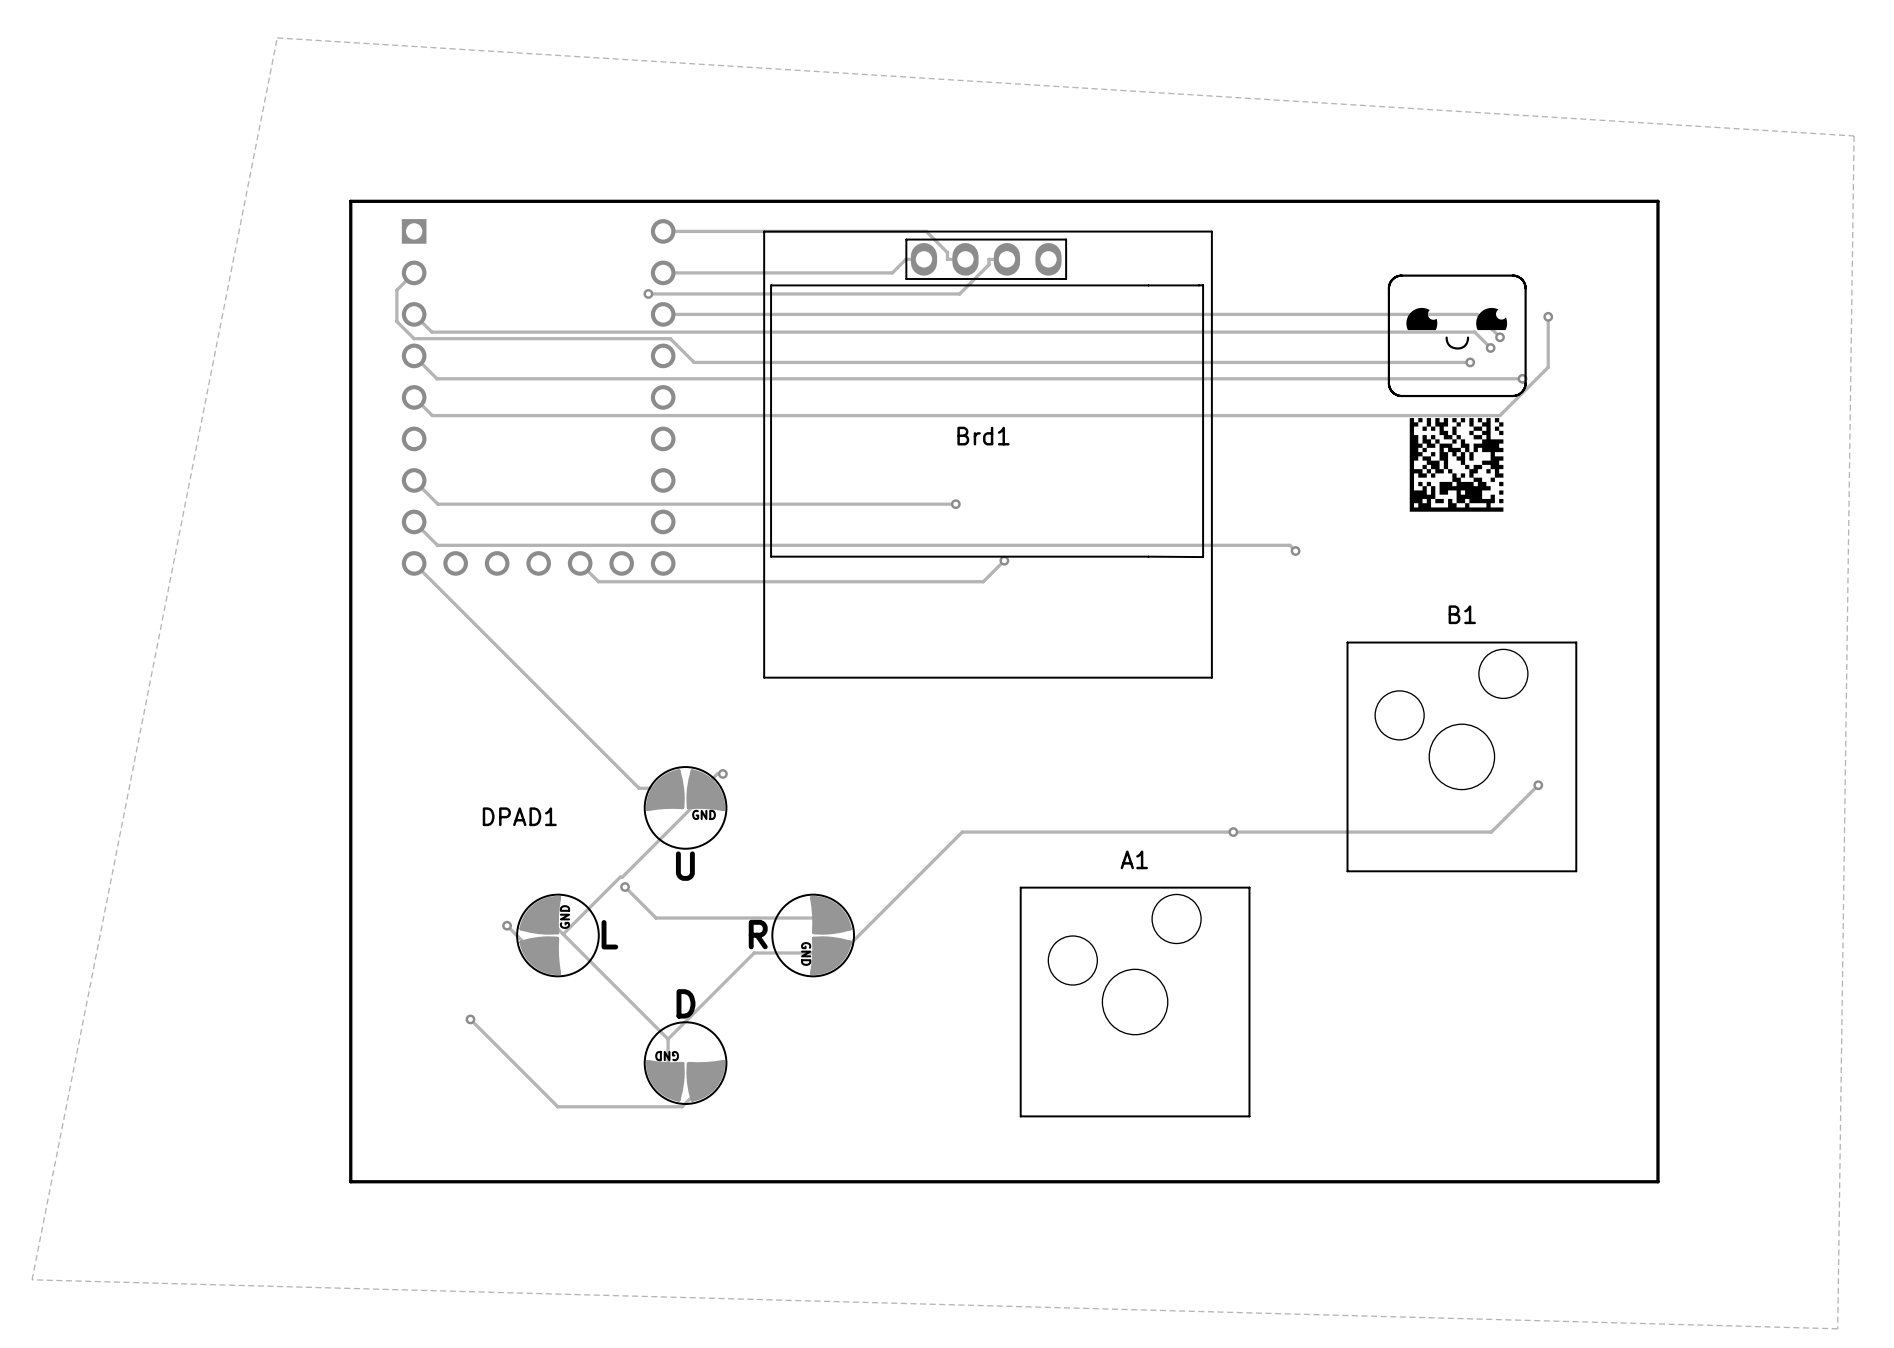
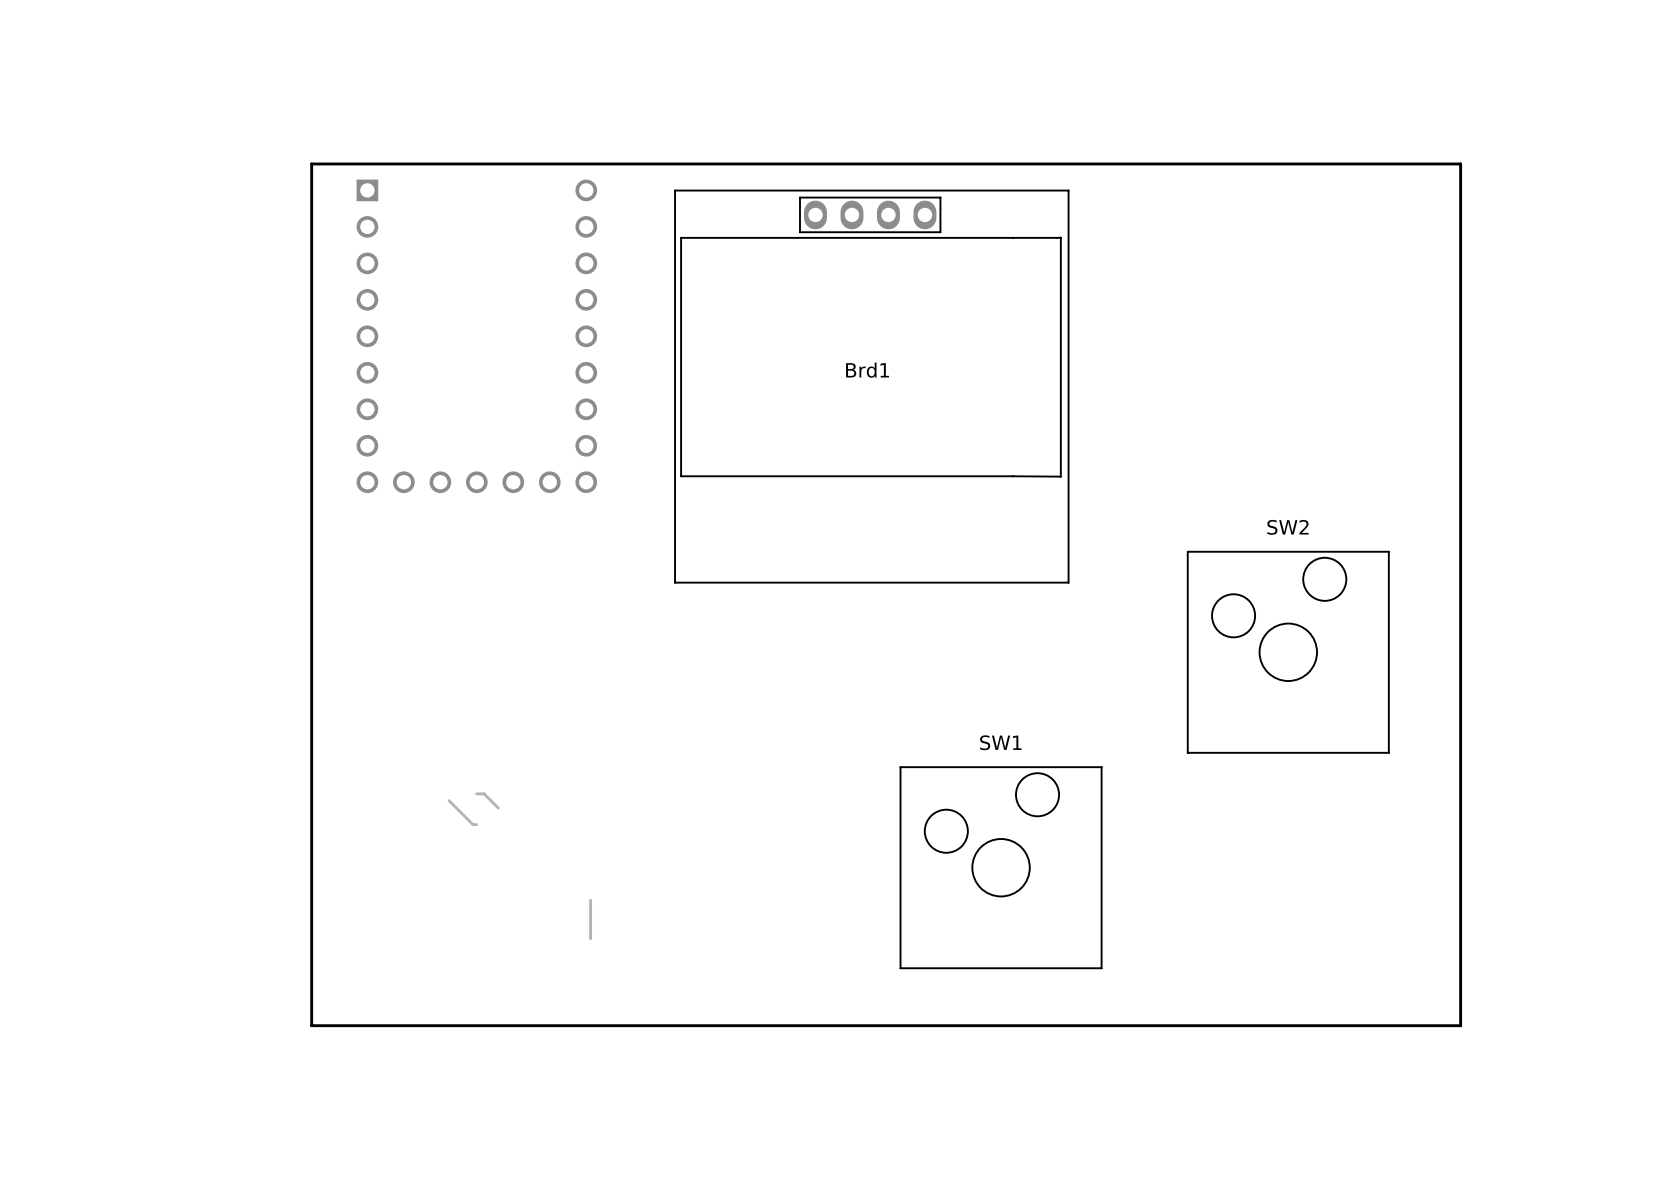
zone outline: (277, 37) (32, 1279) (1837, 1328) (1854, 135) (277, 37) -> none
track: (663, 231) (926, 231) (947, 252) (947, 259) (965, 259) -> none
track: (923, 259) (905, 259) (892, 272) (663, 272) -> none
track: (1006, 259) (988, 259) (988, 264) (959, 293) (648, 293) -> none
track: (414, 272) (396, 290) (396, 321) (414, 338) (670, 338) (694, 362) (1470, 362) -> none
line: (1399, 275) (1392, 279) (1388, 287) (1388, 383) (1393, 392) (1401, 396) (1512, 396) (1522, 391) (1525, 383) (1525, 288) (1521, 278) (1513, 275) (1399, 275) -> none
via: (648, 293) -> none
drawing: [1406, 307, 1508, 350] -> none
track: (414, 314) (431, 332) (1474, 332) (1490, 347) -> none
track: (663, 314) (1477, 314) (1500, 337) -> none
track: (1548, 316) (1548, 367) (1499, 415) (432, 415) (414, 397) -> none
via: (1548, 316) -> none
via: (1500, 337) -> none
via: (1490, 347) -> none
track: (414, 355) (437, 378) (1522, 378) -> none
via: (1470, 362) -> none
via: (1522, 378) -> none
drawing: [1409, 418, 1504, 512] -> none
track: (414, 480) (437, 504) (955, 504) -> none
via: (955, 504) -> none
track: (414, 521) (437, 545) (1289, 545) (1295, 551) -> none
via: (1295, 551) -> none
track: (1004, 560) (983, 581) (598, 581) (580, 563) -> none
via: (1004, 560) -> none
track: (414, 563) (638, 788) (668, 788) -> none
B1 name: B1 (1462, 614) -> SW2 (1287, 527)
track: (722, 773) (717, 773) (703, 788) (703, 796) (563, 934) (668, 1039) (754, 952) (841, 952) (962, 832) (1491, 832) (1538, 785) -> none
via: (722, 773) -> none
via: (1538, 785) -> none
via: (1233, 832) -> none
A1 name: A1 (1134, 859) -> SW1 (1000, 742)
track: (625, 887) (656, 918) (832, 918) -> none
via: (625, 887) -> none
via: (507, 925) -> none
DPAD1: (685, 935) -> none
track: (470, 1019) (557, 1106) (682, 1106) (703, 1085) (703, 1082) -> none
via: (470, 1019) -> none

